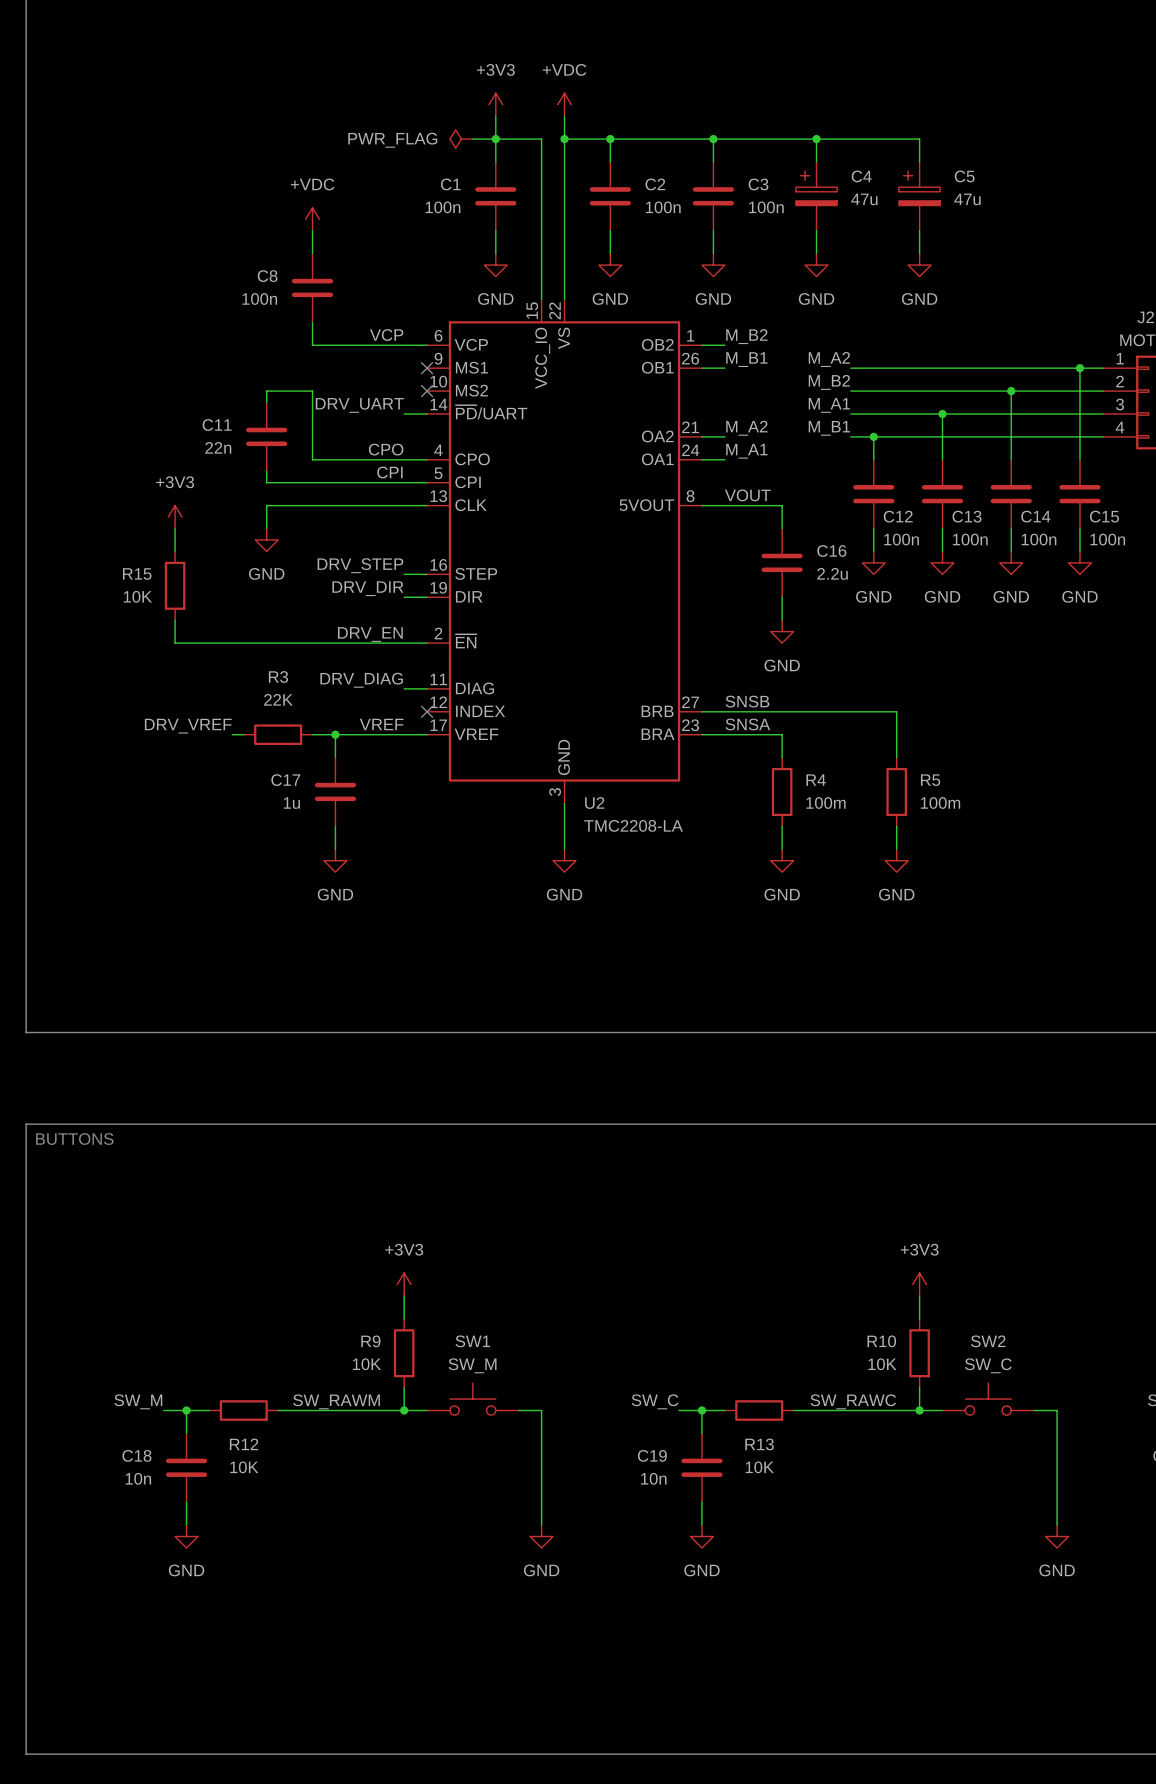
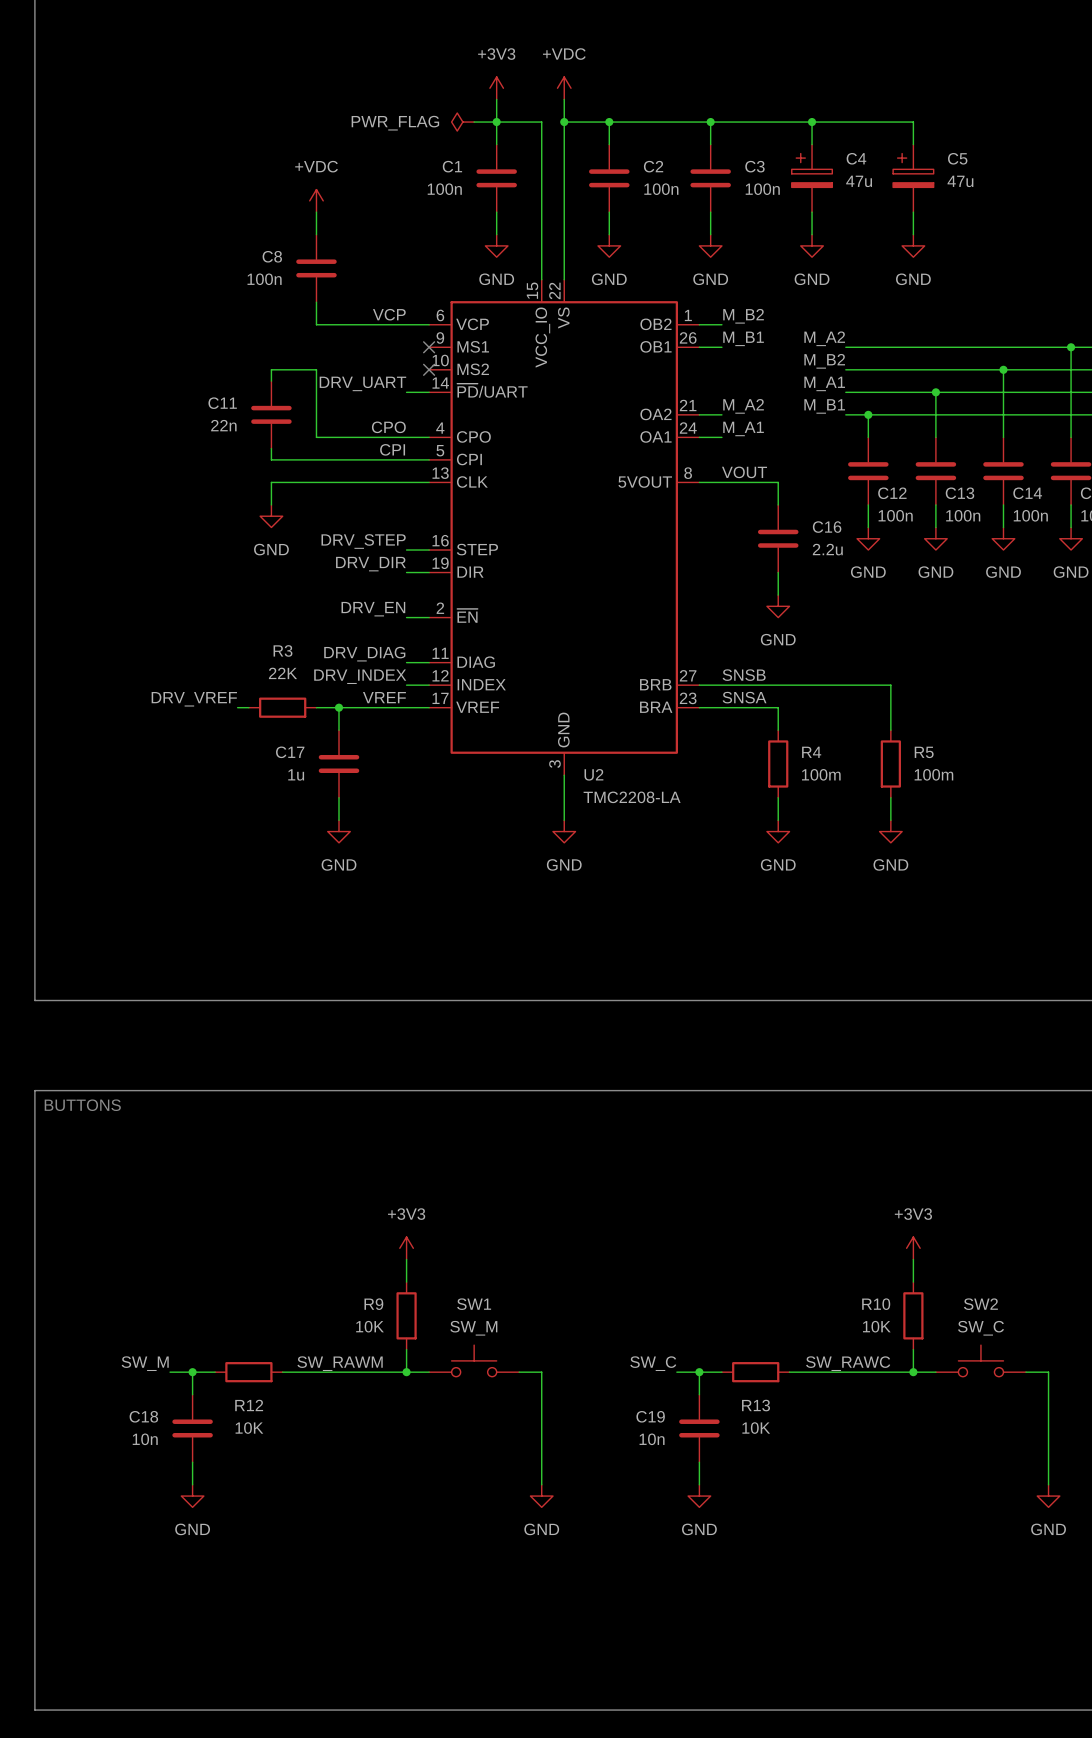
power symbol: +3V3 (175, 517) -> none
wire: (175, 528) (175, 551) -> none
R15: 10K (175, 585) -> none
wire: (175, 620) (175, 643) (404, 643) -> none
label: none -> DRV_INDEX (360, 676)
wire: none -> (406, 685) (429, 685)
no-connect mark: (427, 711) -> none

